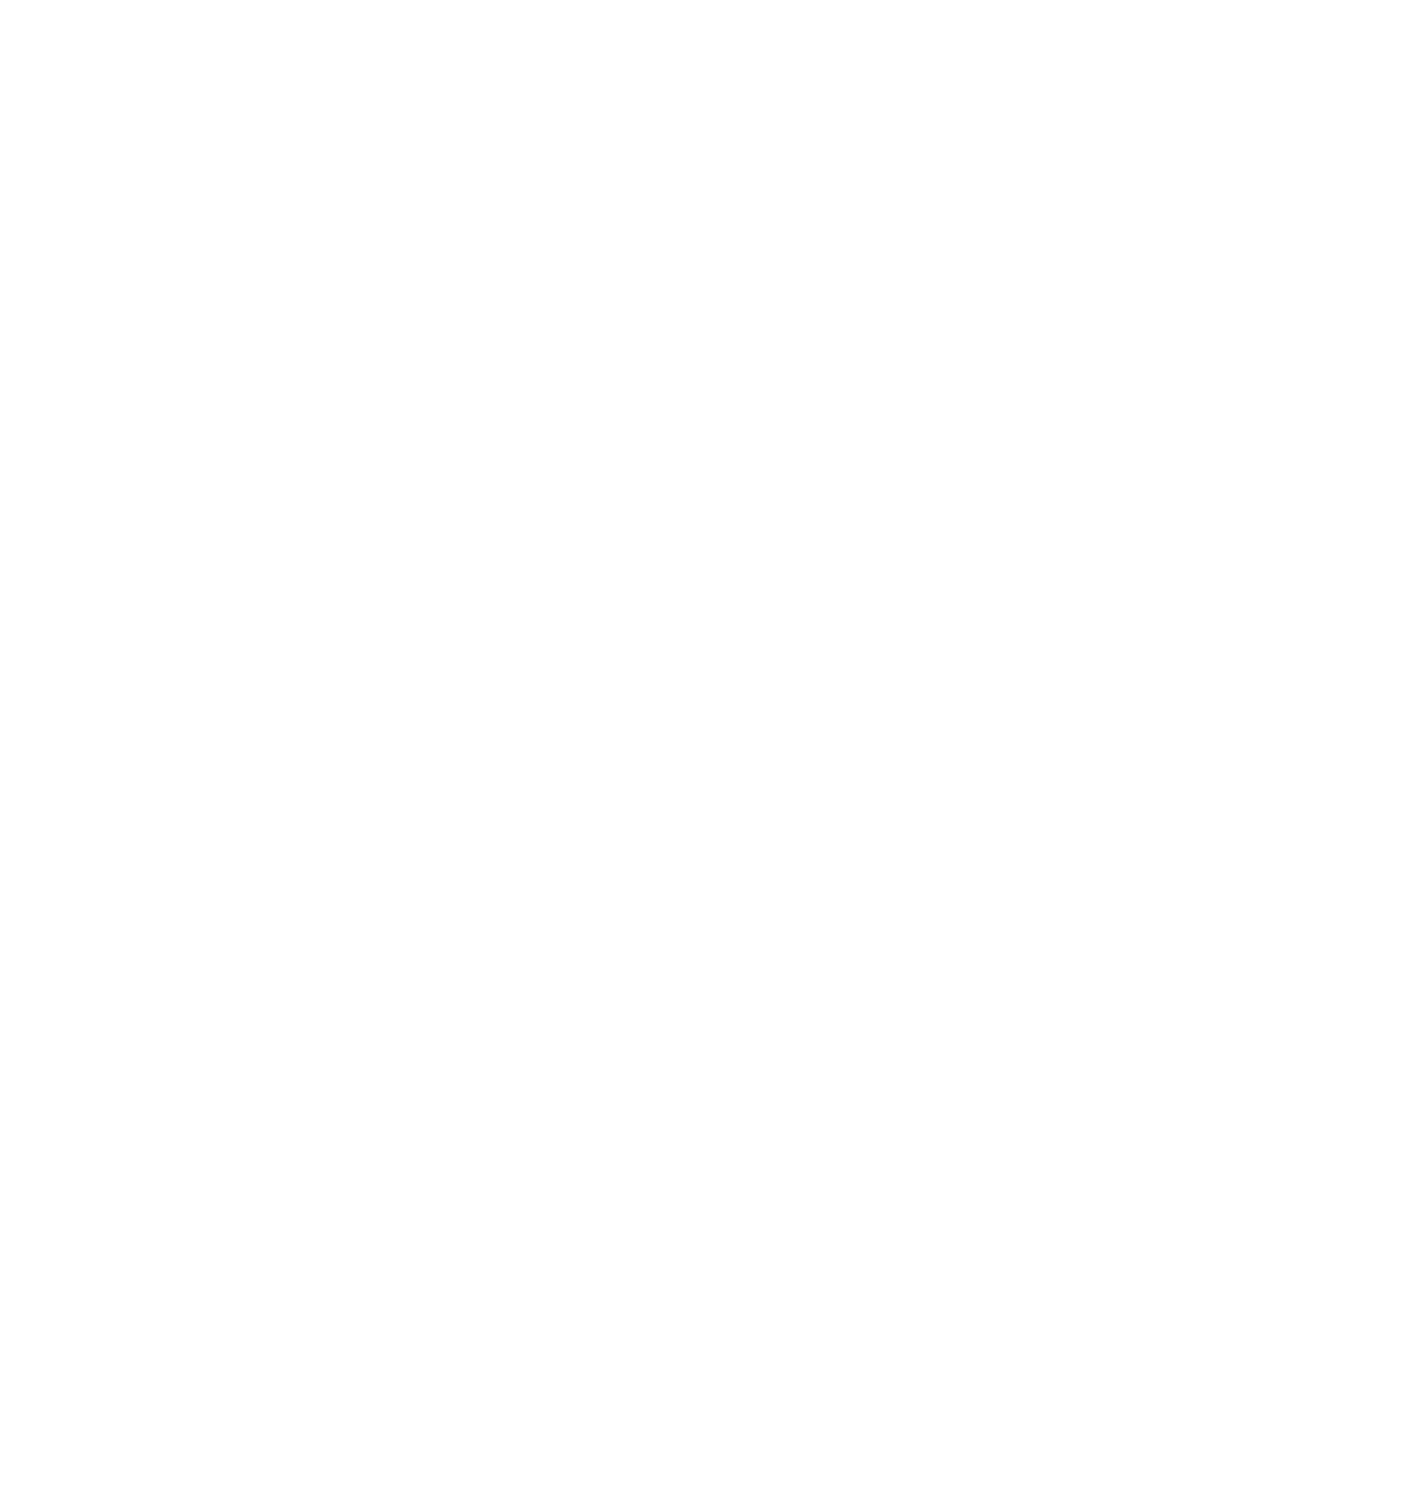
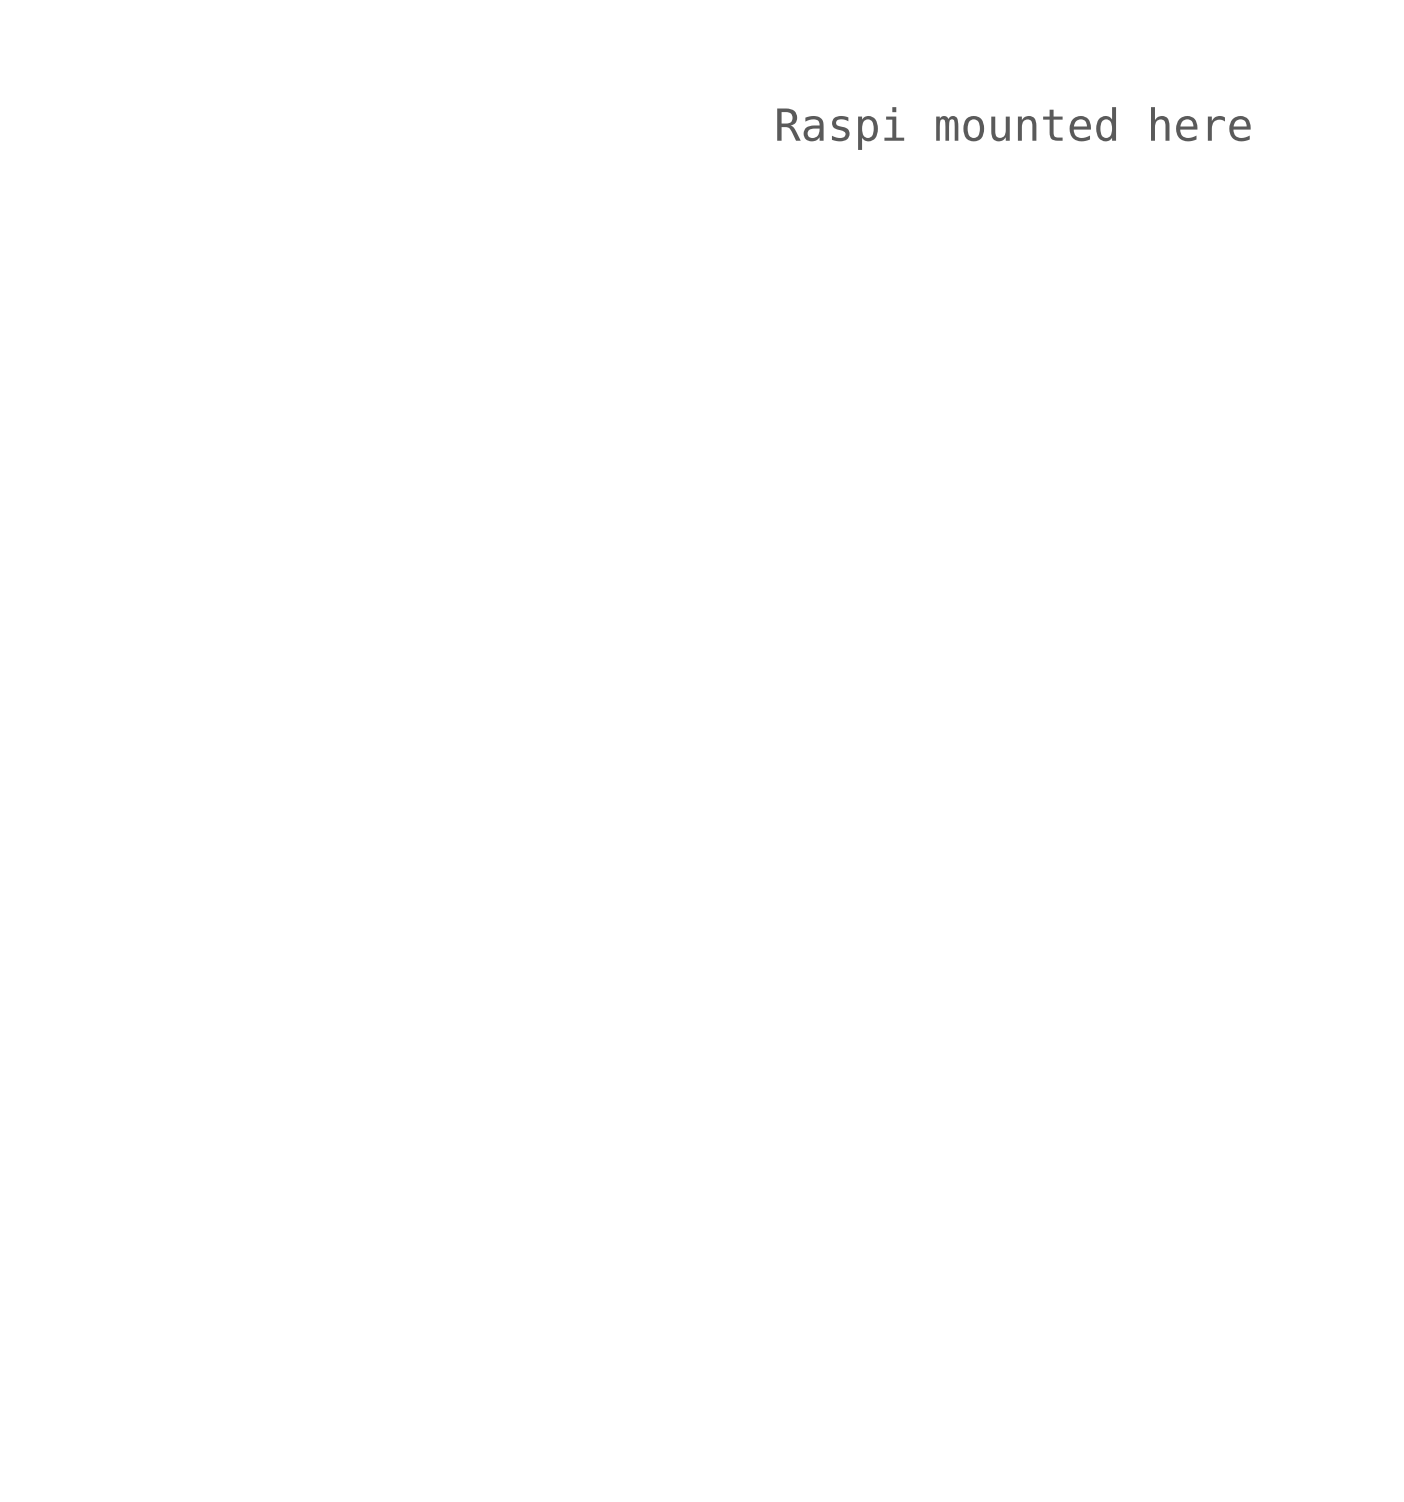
text: none -> Raspi mounted here (1013, 128)

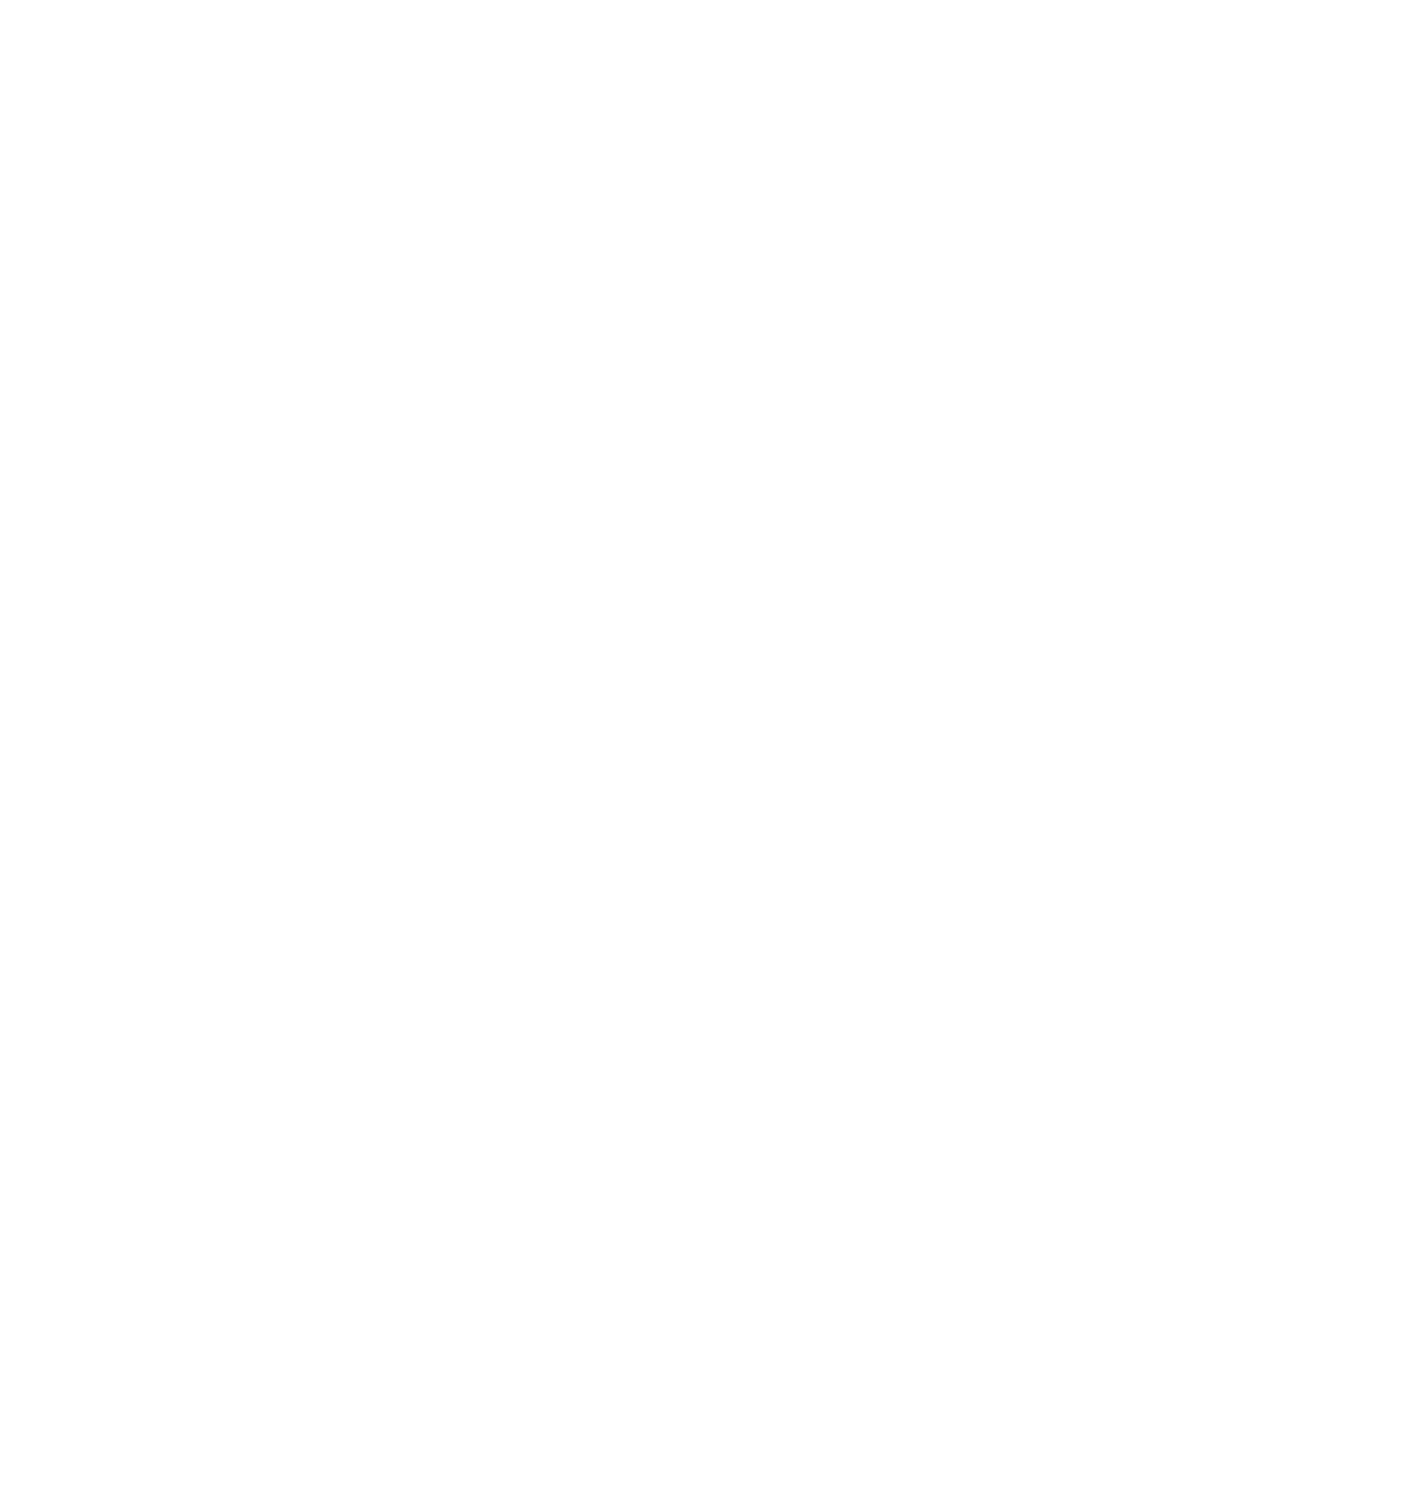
text: Raspi mounted here (1013, 128) -> none

